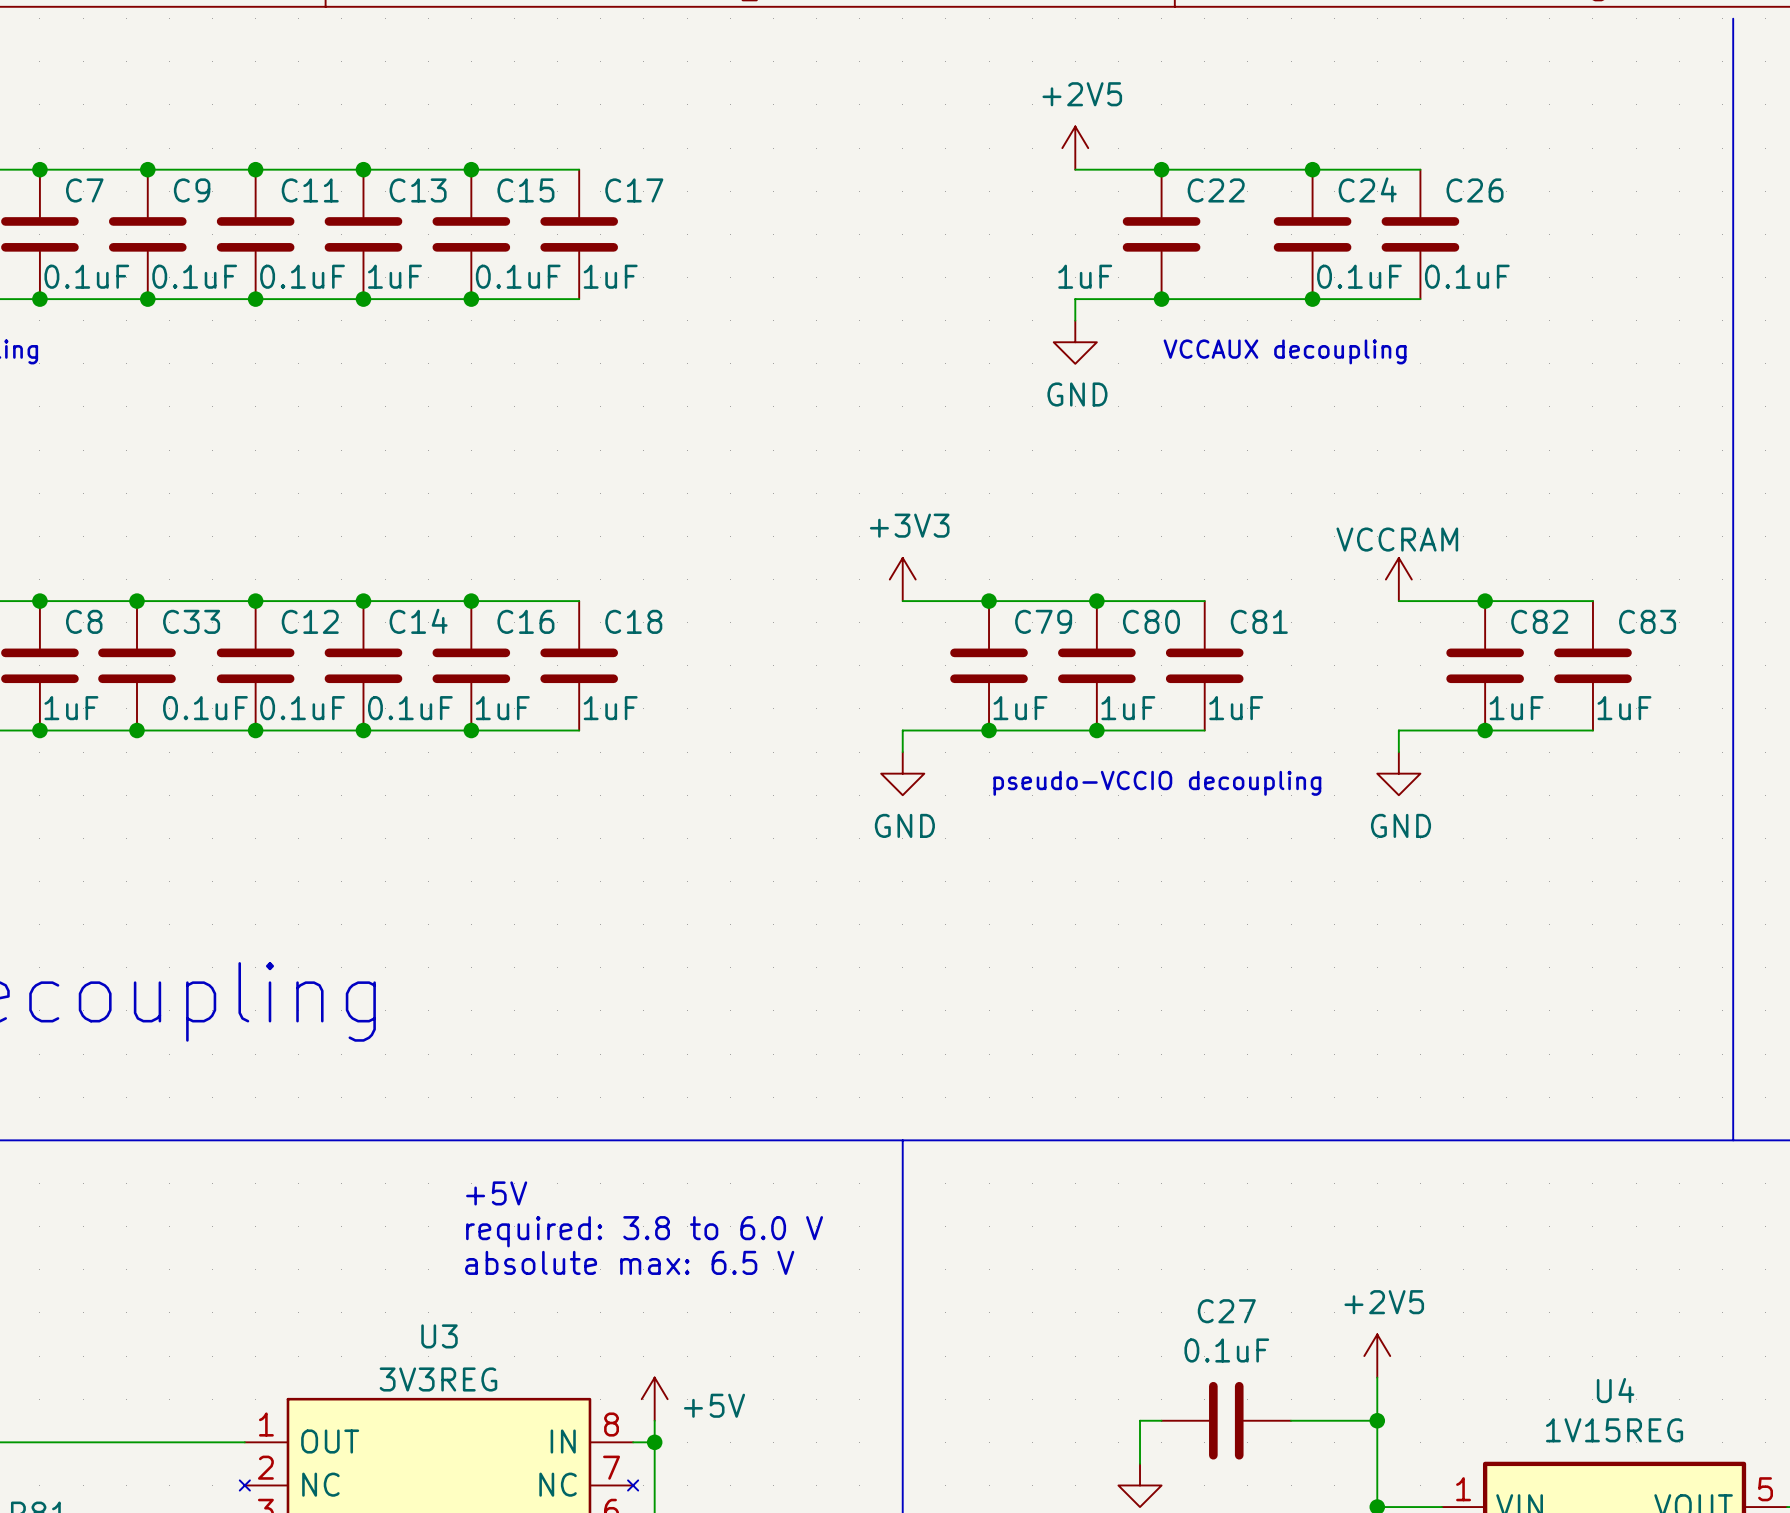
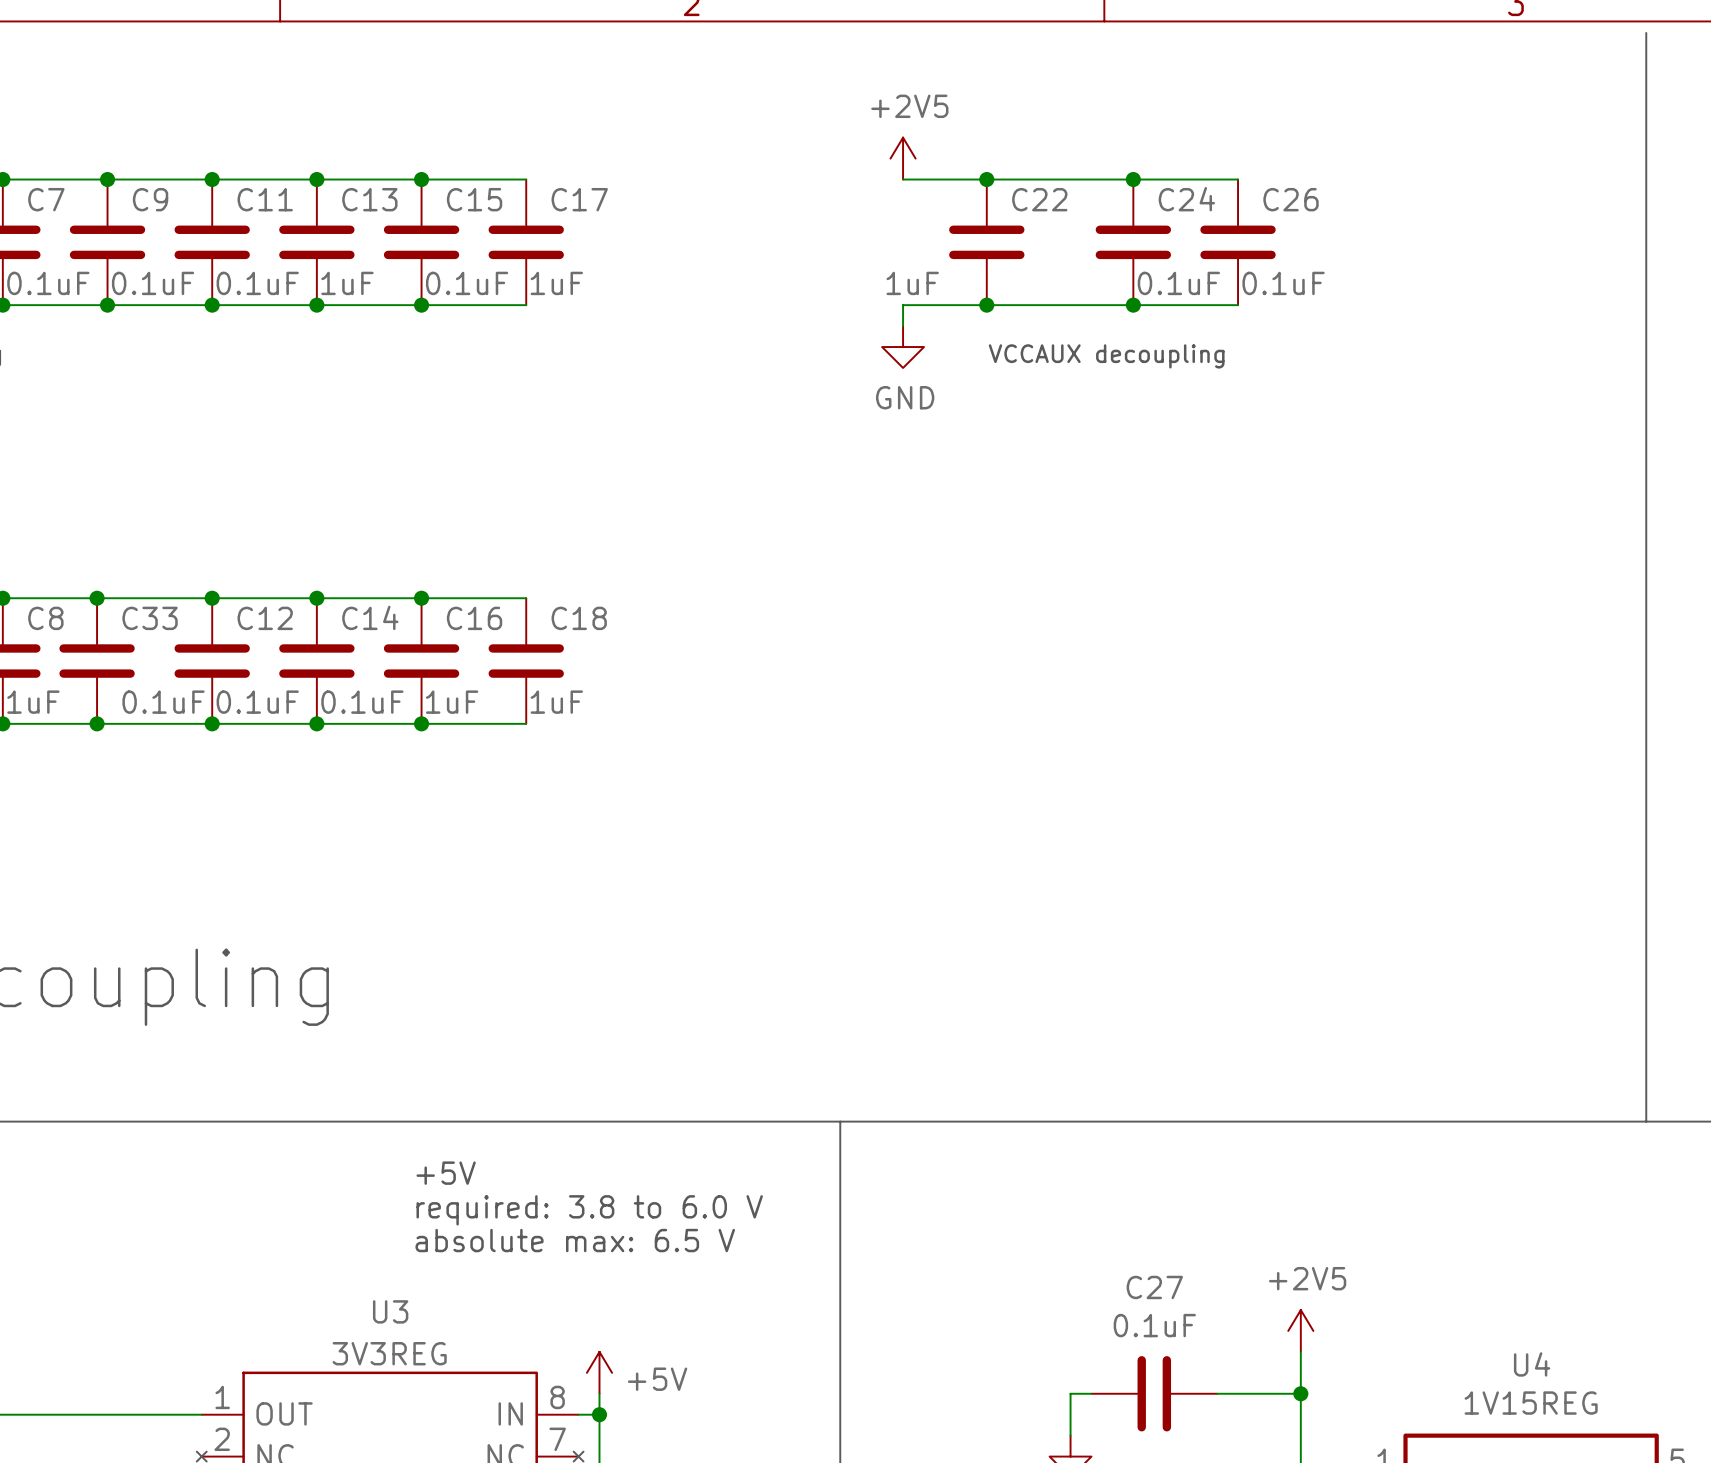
power symbol position: +2V5 (1075, 148) -> +2V5 (903, 158)
junction: none -> (986, 179)
junction position: (1161, 169) -> (1133, 179)
wire: (1312, 169) (1420, 169) -> (903, 179) (1007, 179)
junction: (1312, 169) -> none
C24 name: C24 (1367, 189) -> C26 (1291, 199)
C22 position: (1161, 234) -> (986, 242)
C24: none -> 0.1uF (1133, 242)
C26: 0.1uF (1420, 234) -> none
junction: none -> (986, 305)
wire: (1075, 299) (1075, 320) -> (1007, 305) (903, 305) (903, 326)
junction position: (1161, 299) -> (1133, 305)
wire: (1312, 299) (1420, 299) -> none
junction: (1312, 299) -> none
power symbol position: GND (1075, 342) -> GND (903, 347)
text position: VCCAUX decoupling (1285, 351) -> VCCAUX decoupling (1106, 356)
power symbol: +3V3 (902, 579) -> none
power symbol: VCCRAM (1398, 579) -> none
wire: (902, 601) (1204, 601) -> none
junction: (989, 601) -> none
junction: (1096, 601) -> none
wire: (1398, 601) (1592, 601) -> none
junction: (1485, 601) -> none
C79: 1uF (989, 665) -> none
C80: 1uF (1096, 665) -> none
C81: 1uF (1204, 665) -> none
C82: 1uF (1485, 665) -> none
C83: 1uF (1592, 665) -> none
junction: (989, 730) -> none
junction: (1096, 730) -> none
wire: (1204, 730) (902, 730) (902, 752) -> none
junction: (1485, 730) -> none
wire: (1592, 730) (1398, 730) (1398, 752) -> none
power symbol: GND (902, 773) -> none
power symbol: GND (1398, 773) -> none
text: pseudo-VCCIO decoupling (1157, 783) -> none

